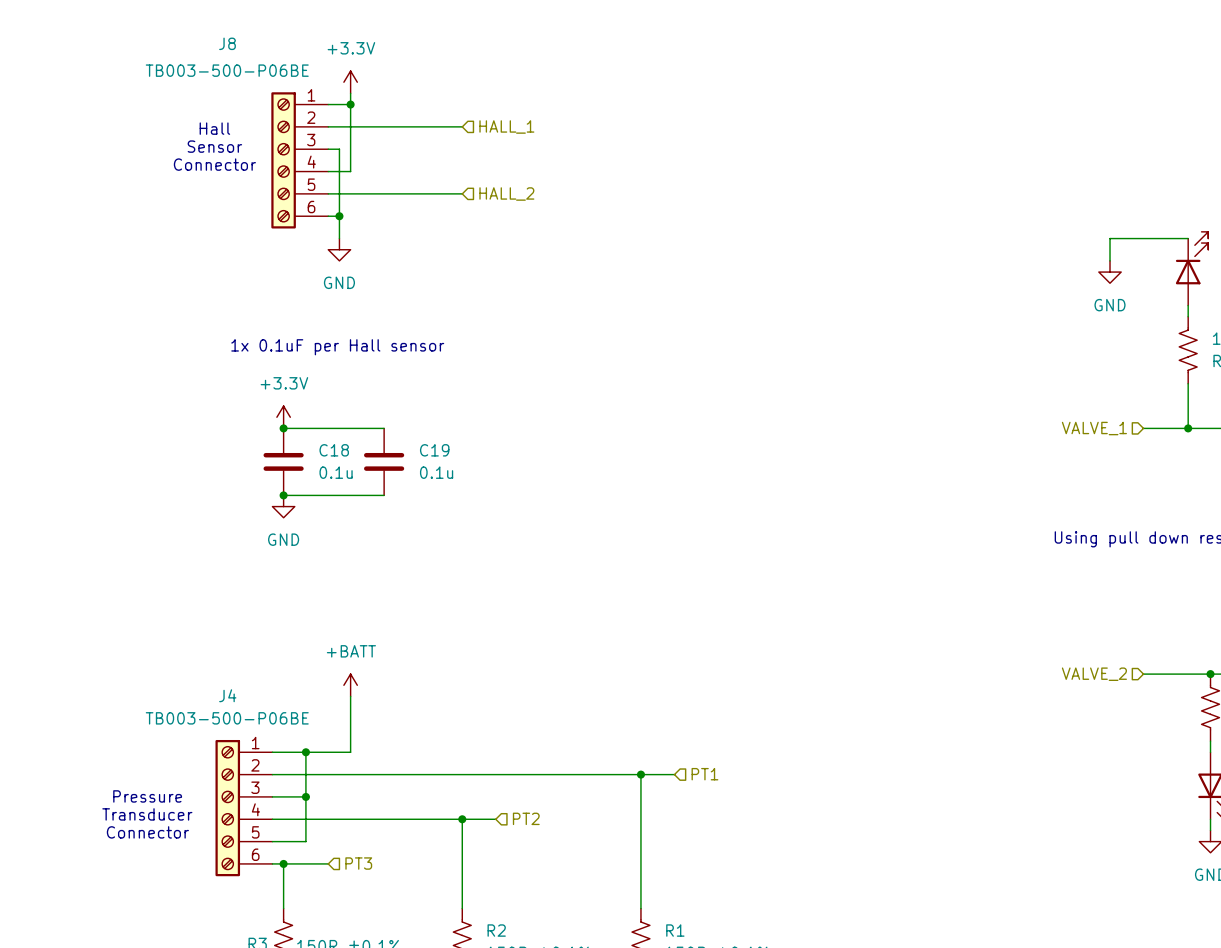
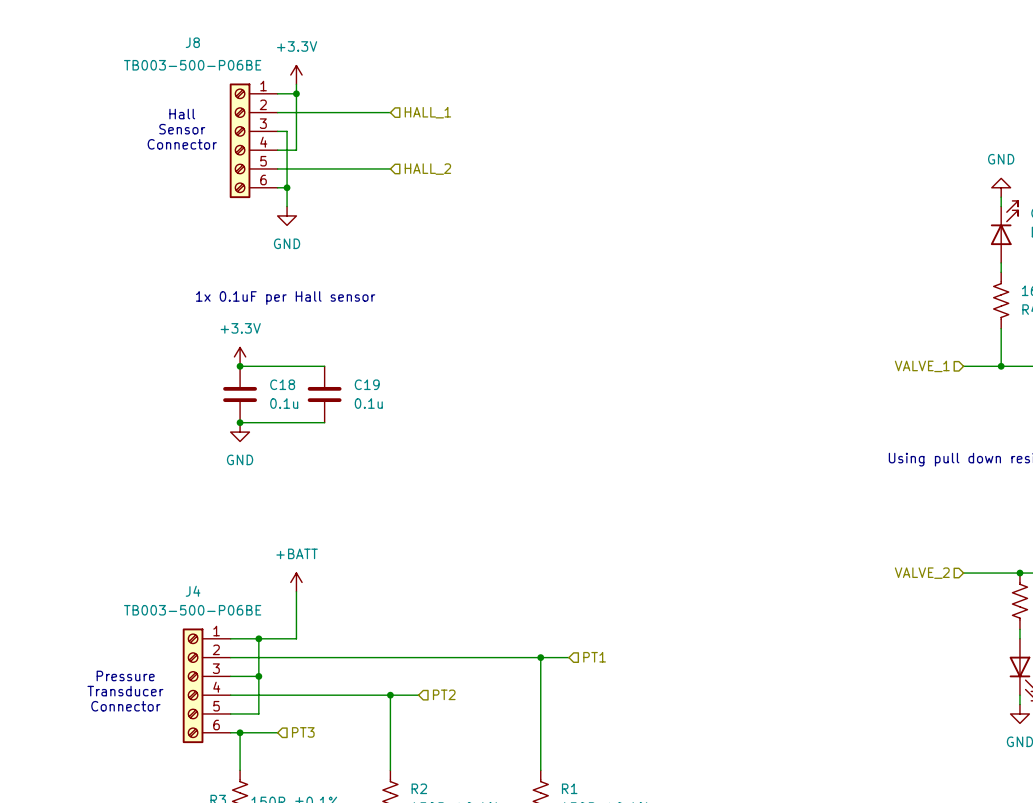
wire: (1188, 238) (1110, 238) (1110, 260) -> (1001, 206) (1001, 197)
power symbol rotation: 0° (1110, 272) -> 180° (1001, 187)
power symbol position: GND (1110, 272) -> GND (1001, 187)

